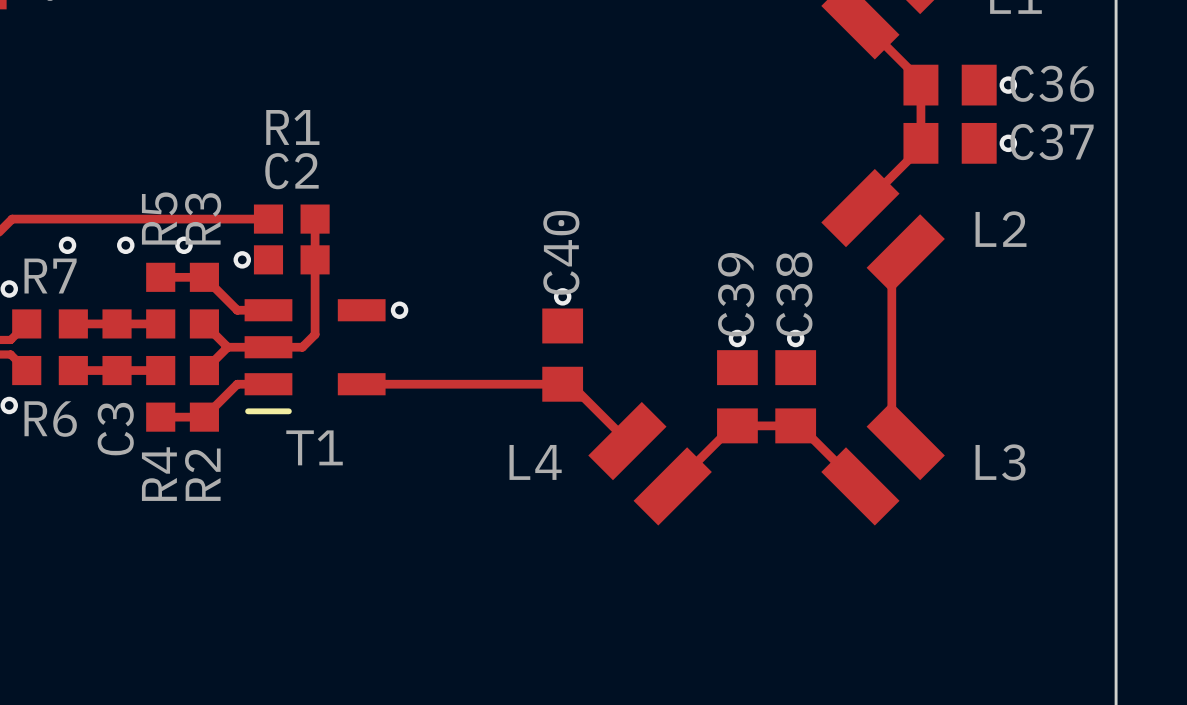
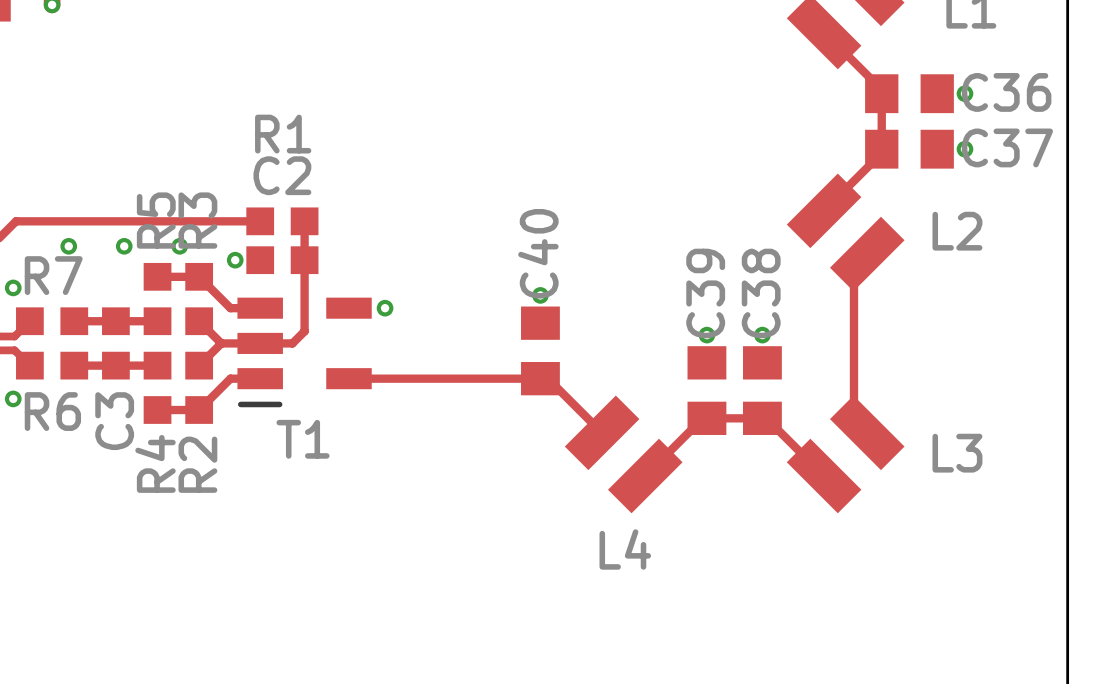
L4 name position: L4 (535, 462) -> L4 (625, 549)

